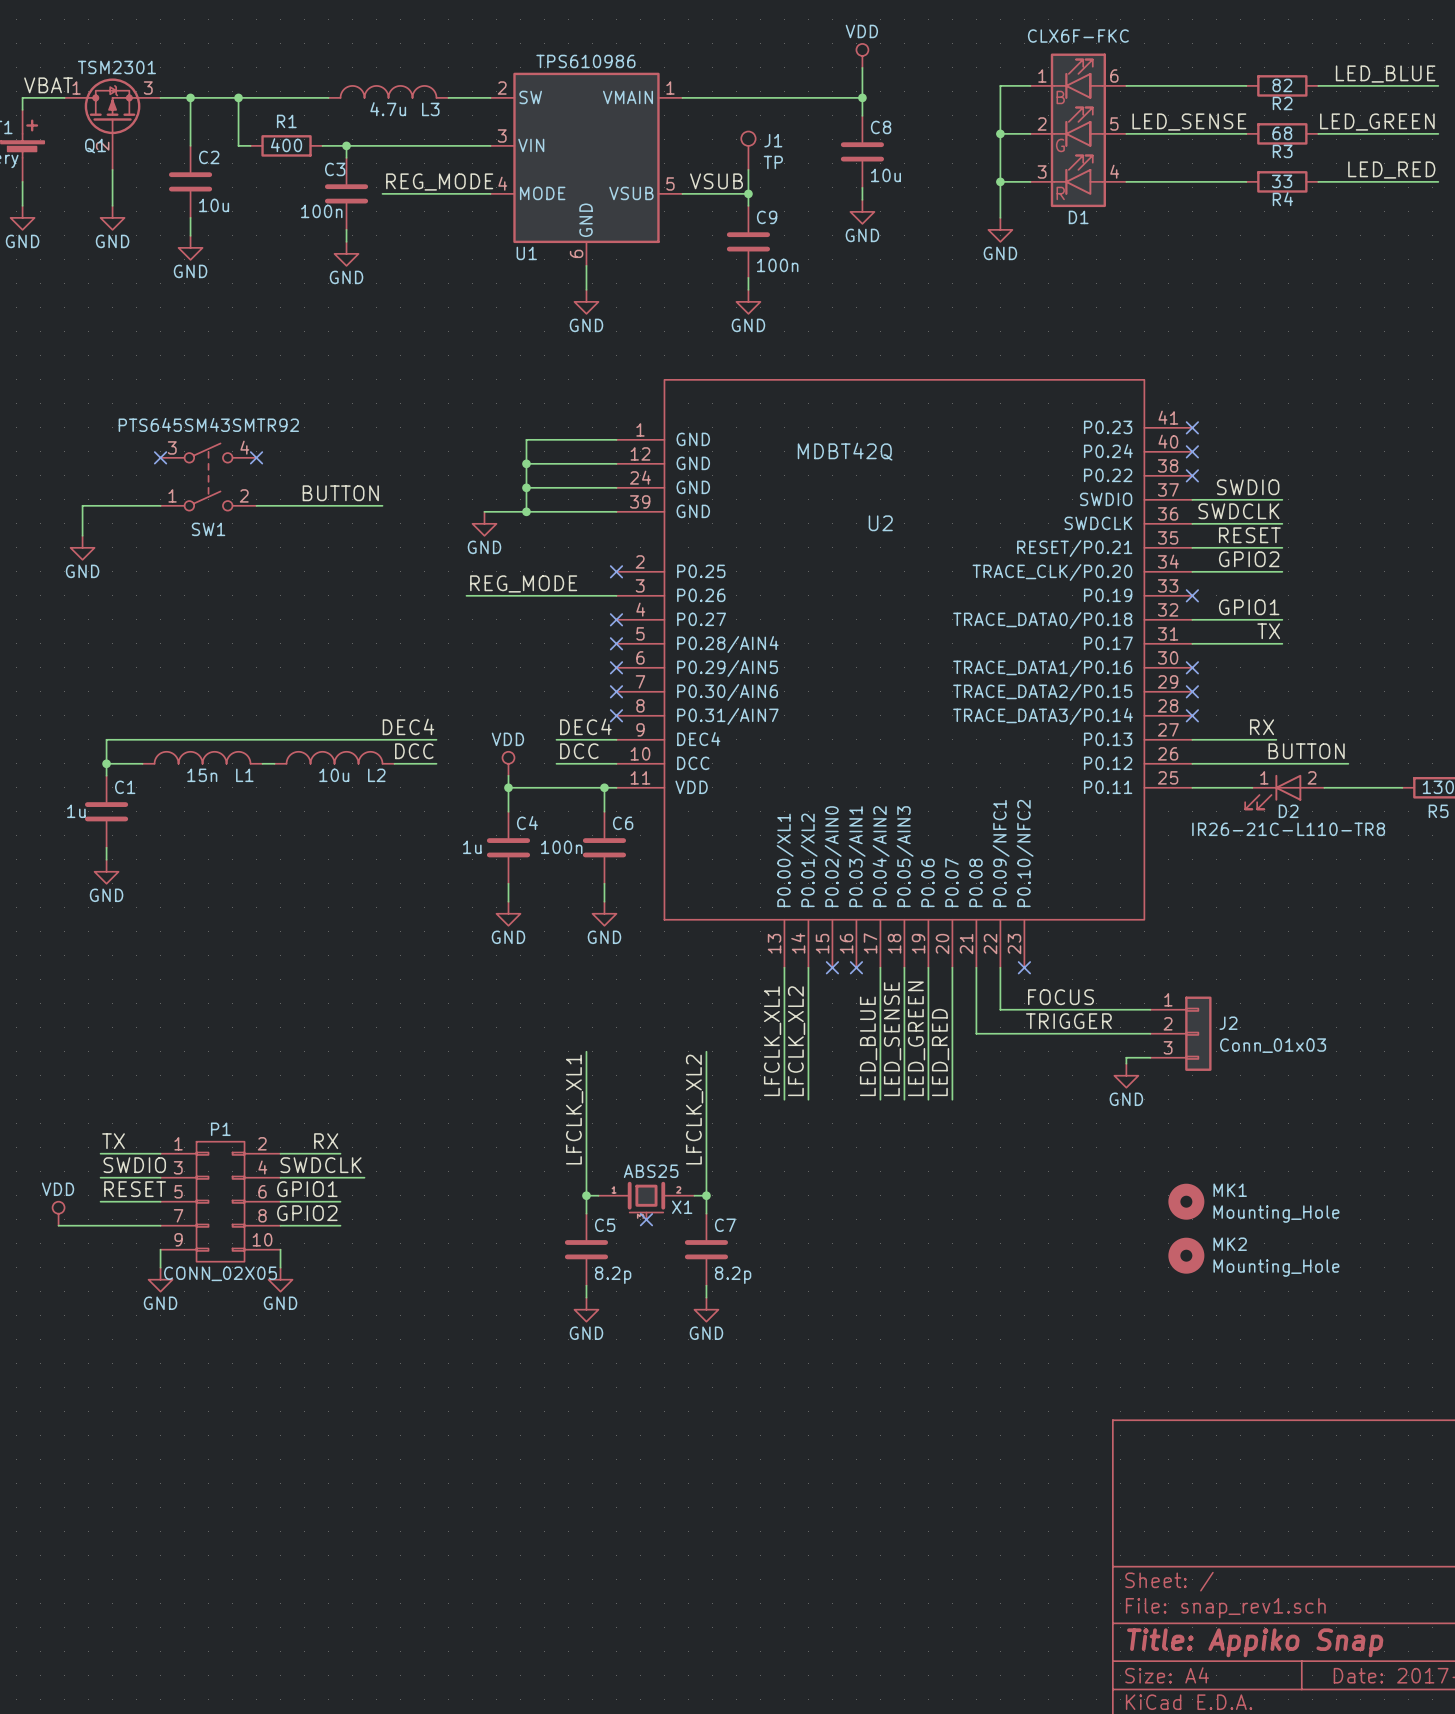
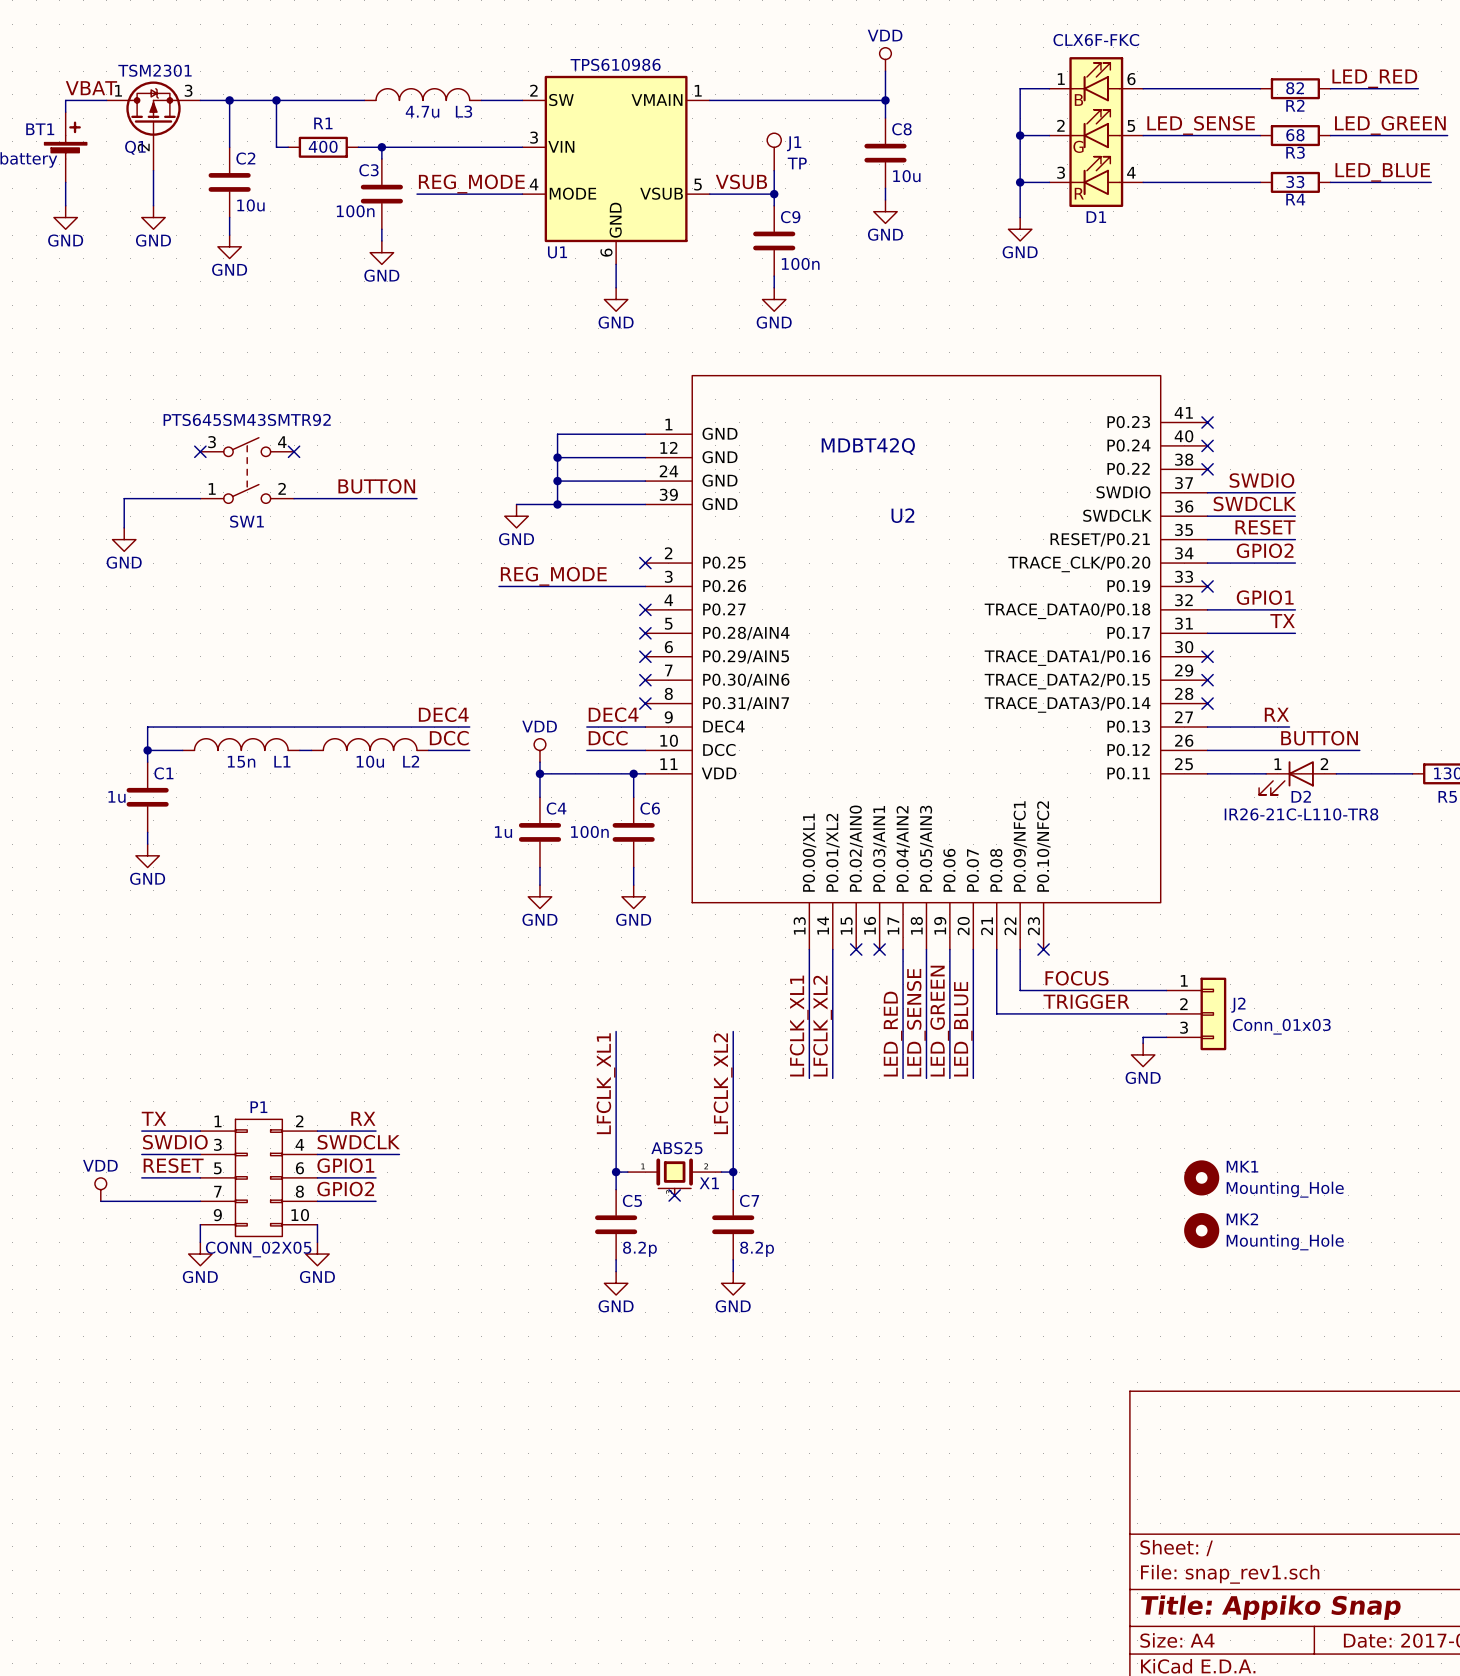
label position: LED_BLUE (1385, 74) -> LED_BLUE (1382, 172)
wire: (1408, 85) (1438, 85) -> none
label position: LED_RED (1391, 170) -> LED_RED (1374, 78)
wire: (1421, 181) (1438, 181) -> none
label: LED_BLUE (868, 1046) -> LED_RED (893, 1034)
label: LED_RED (940, 1052) -> LED_BLUE (963, 1029)

